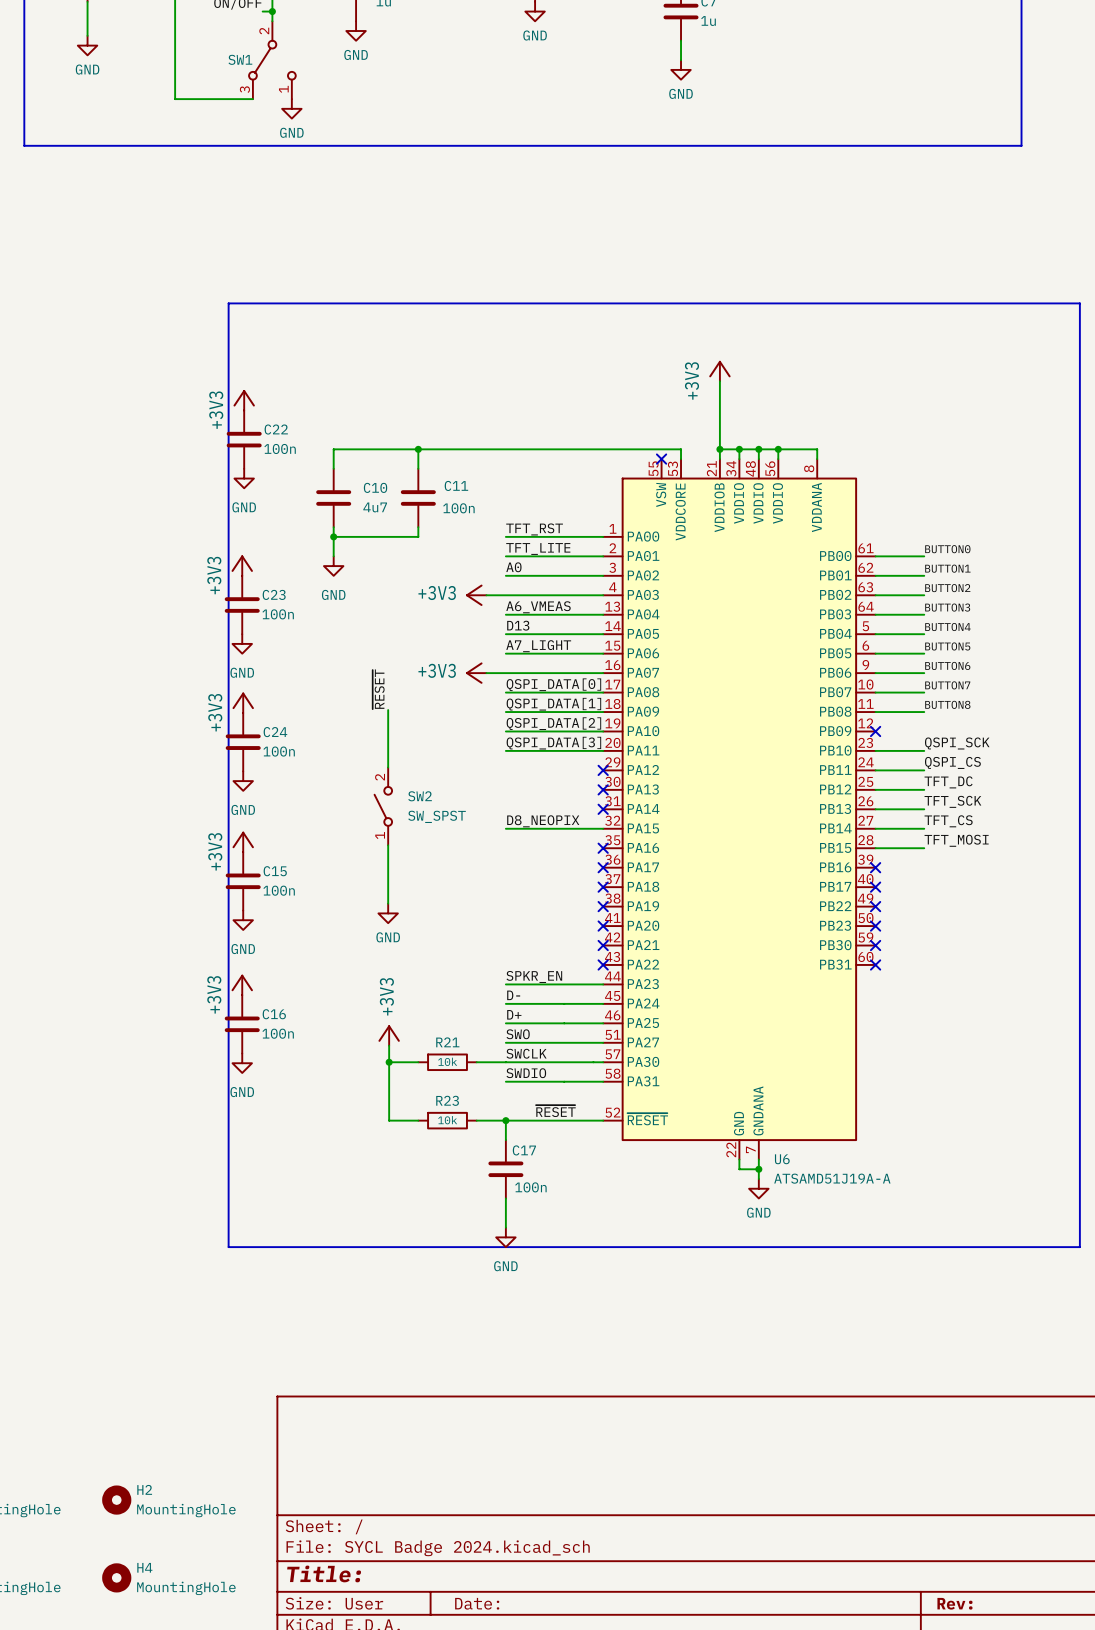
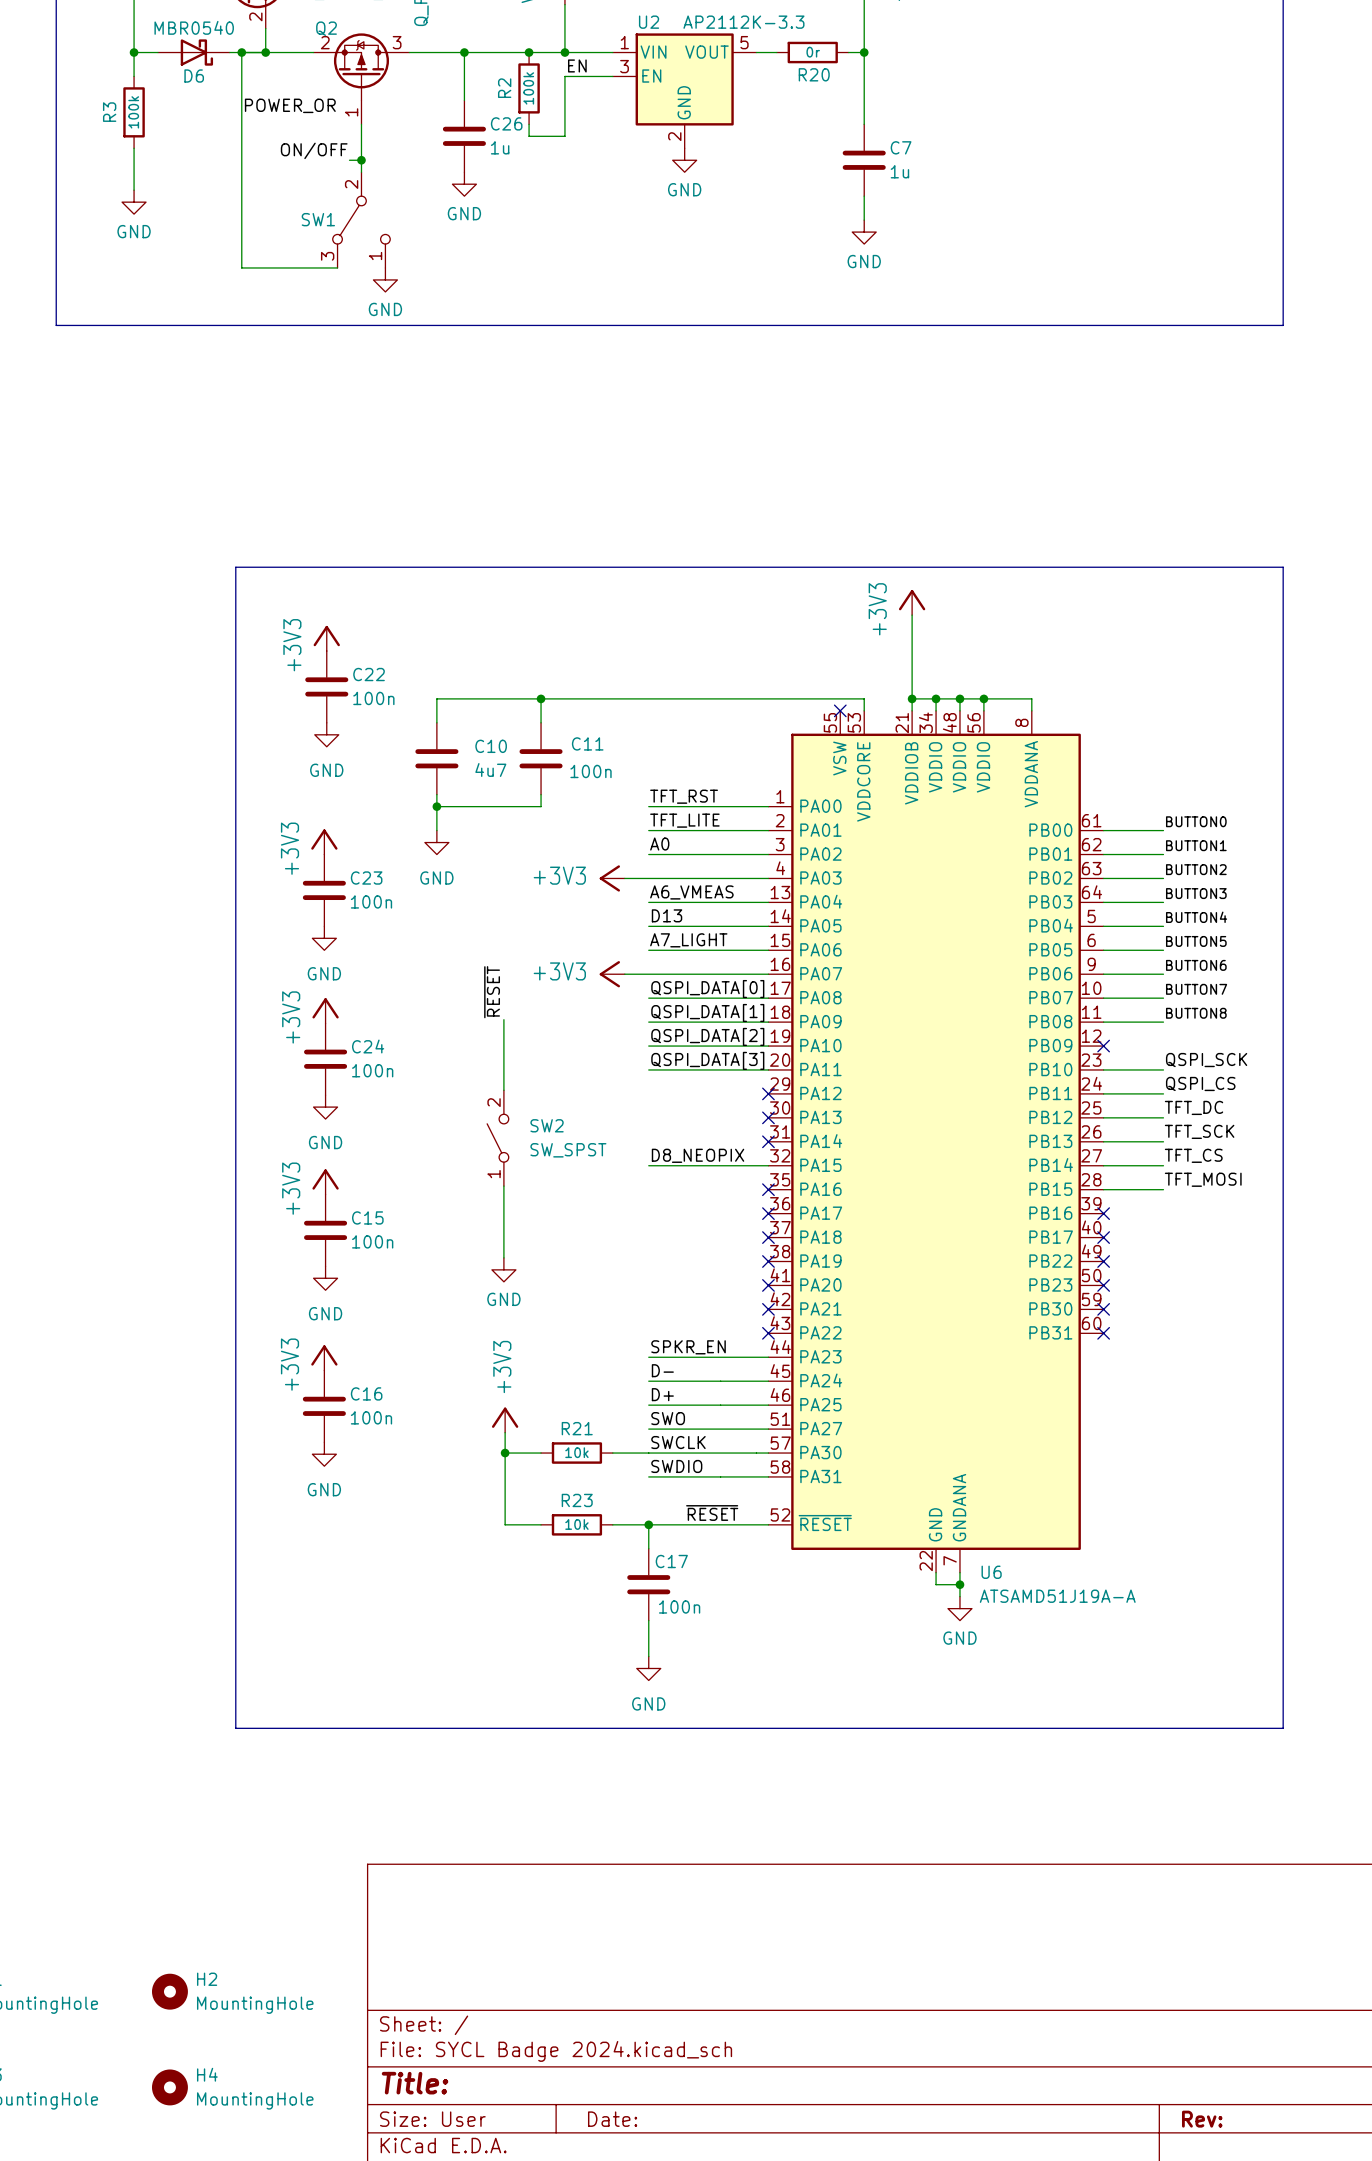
line: (228, 303) (1079, 303) (1079, 1247) (228, 1247) (228, 303) -> (235, 567) (1283, 567) (1283, 1728) (235, 1728) (235, 567)

